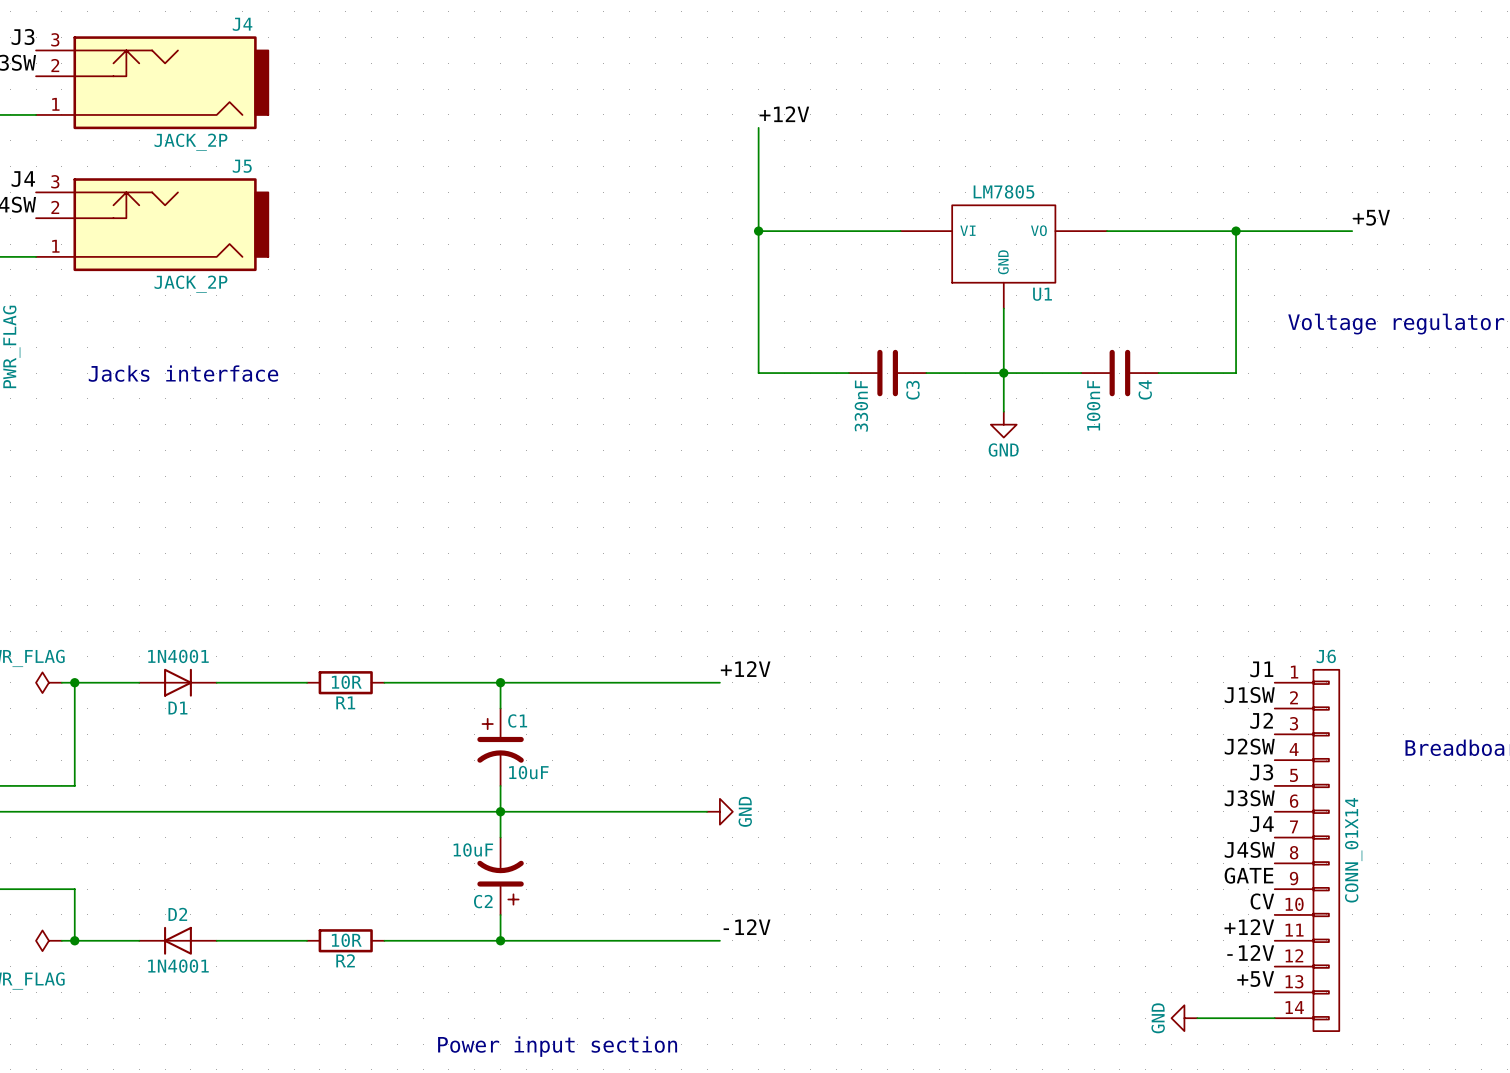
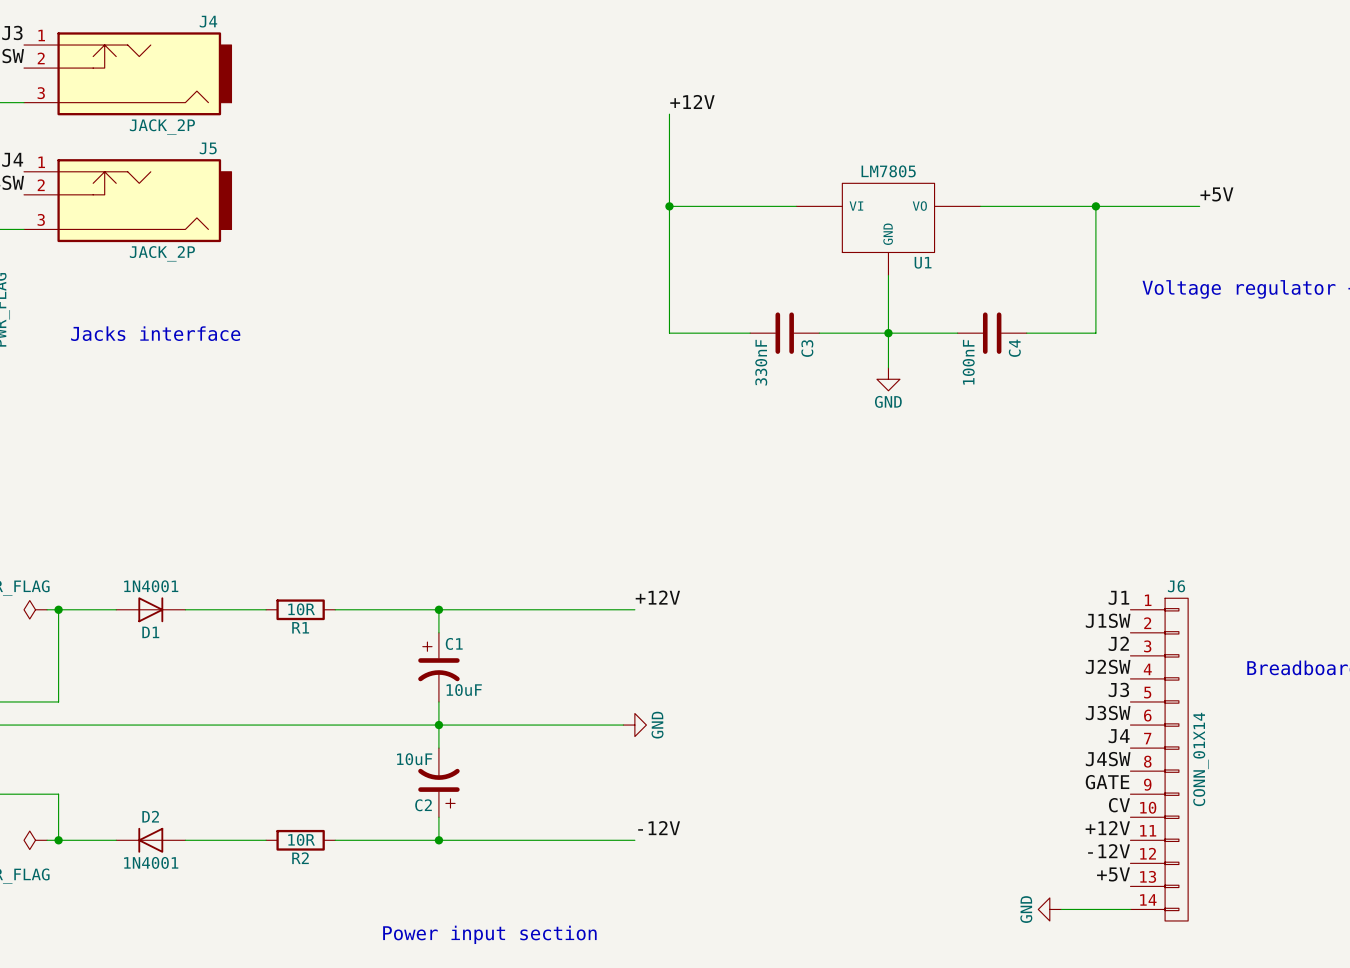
J4 pin number: 3 (55, 39) -> 1 (41, 35)
J4 pin number: 1 (55, 104) -> 3 (41, 93)
J5 pin number: 3 (55, 181) -> 1 (41, 162)
J5 pin number: 1 (55, 246) -> 3 (41, 219)

